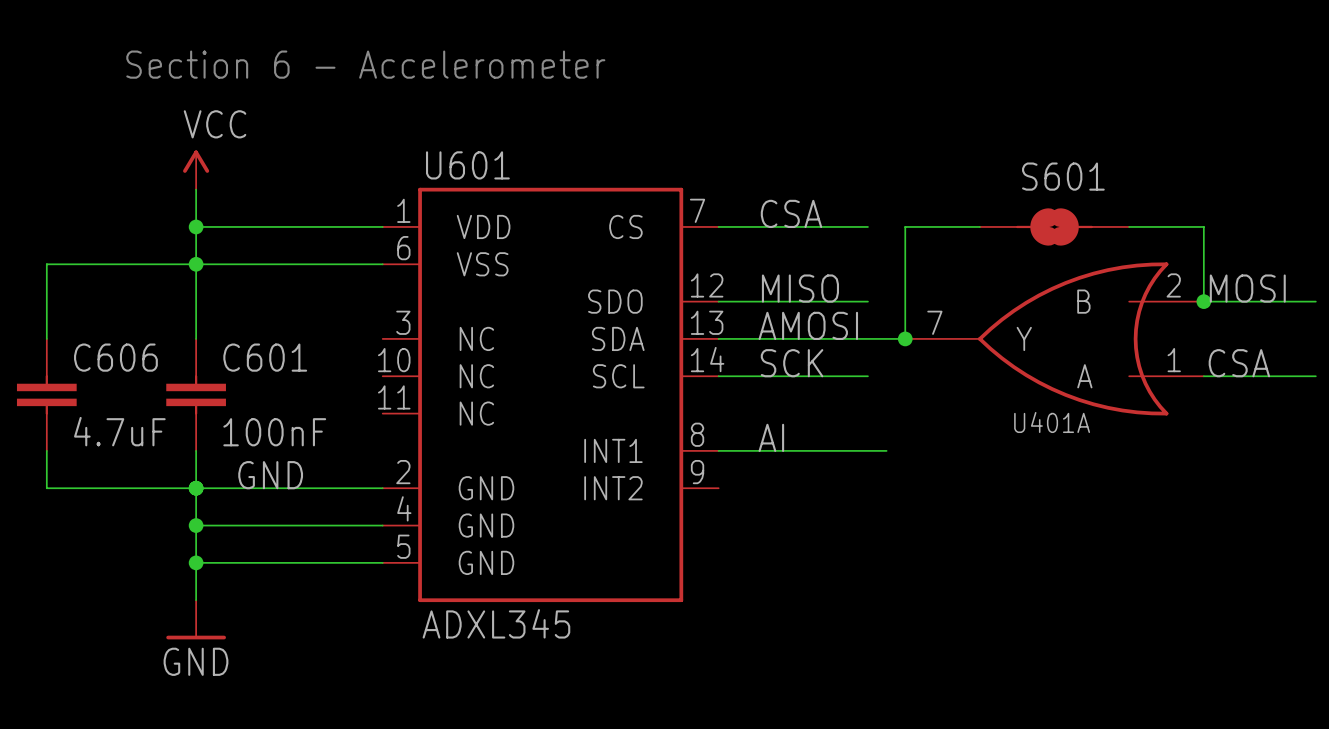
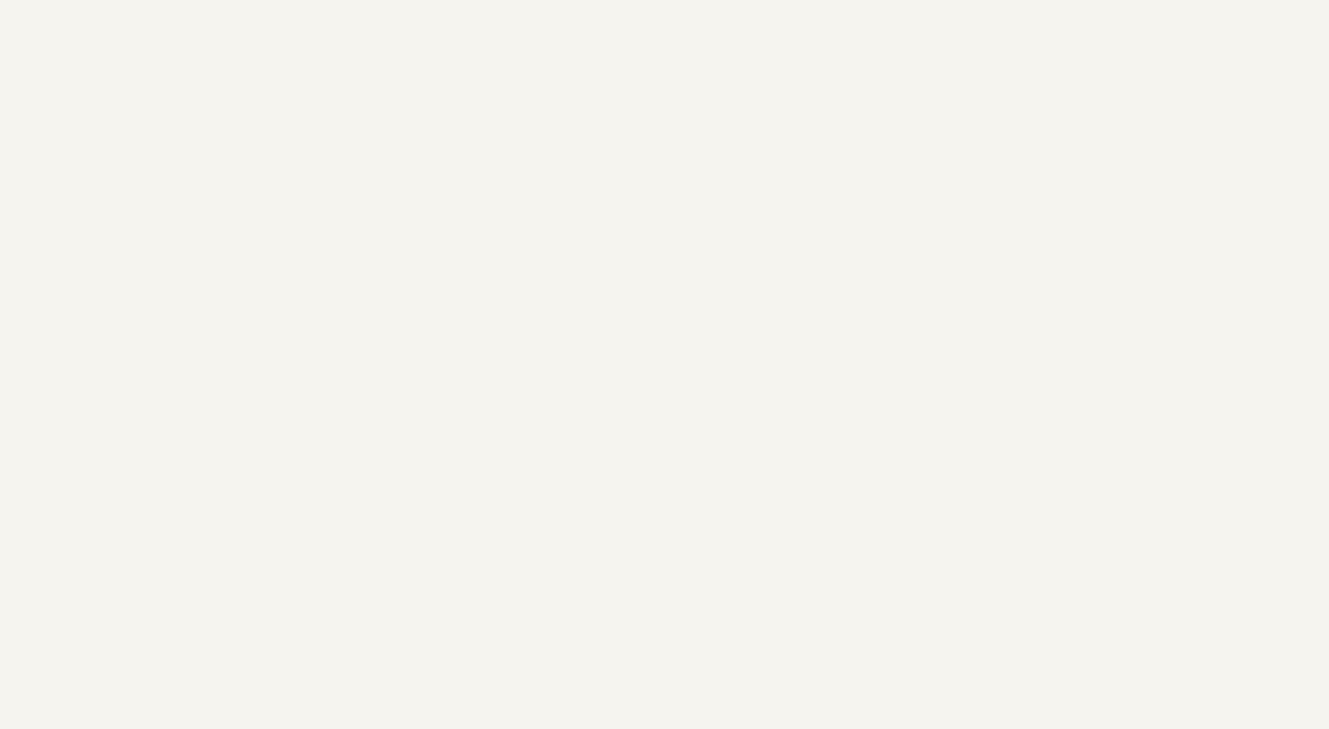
text: Section 6 - Accelerometer (365, 64) -> none
power symbol: VCC (196, 170) -> none
wire: (196, 189) (196, 338) -> none
label: CSA (791, 213) -> none
wire: (196, 226) (382, 226) -> none
junction: (196, 226) -> none
wire: (718, 226) (867, 226) -> none
wire: (979, 226) (905, 226) (905, 338) (718, 338) -> none
S601: (1054, 226) -> none
wire: (1129, 226) (1203, 226) (1203, 301) (1315, 301) -> none
junction: (196, 264) -> none
wire: (382, 264) (46, 264) (46, 338) -> none
label: MISO (800, 288) -> none
label: MOSI (1247, 288) -> none
wire: (718, 301) (867, 301) -> none
junction: (1203, 301) -> none
label: AMOSI (808, 325) -> none
junction: (905, 338) -> none
U401A: (1054, 338) -> none
label: SCK (792, 363) -> none
label: CSA (1239, 363) -> none
wire: (718, 376) (867, 376) -> none
wire: (1203, 376) (1315, 376) -> none
C606: 4.7uF (46, 394) -> none
C601: 100nF (196, 394) -> none
U601: ADXL345 (550, 394) -> none
label: AI (771, 437) -> none
wire: (46, 450) (46, 488) (382, 488) -> none
wire: (196, 450) (196, 600) -> none
wire: (718, 450) (886, 450) -> none
label: GND (270, 475) -> none
junction: (196, 488) -> none
wire: (196, 525) (382, 525) -> none
junction: (196, 525) -> none
wire: (196, 562) (382, 562) -> none
junction: (196, 562) -> none
power symbol: GND (196, 619) -> none

